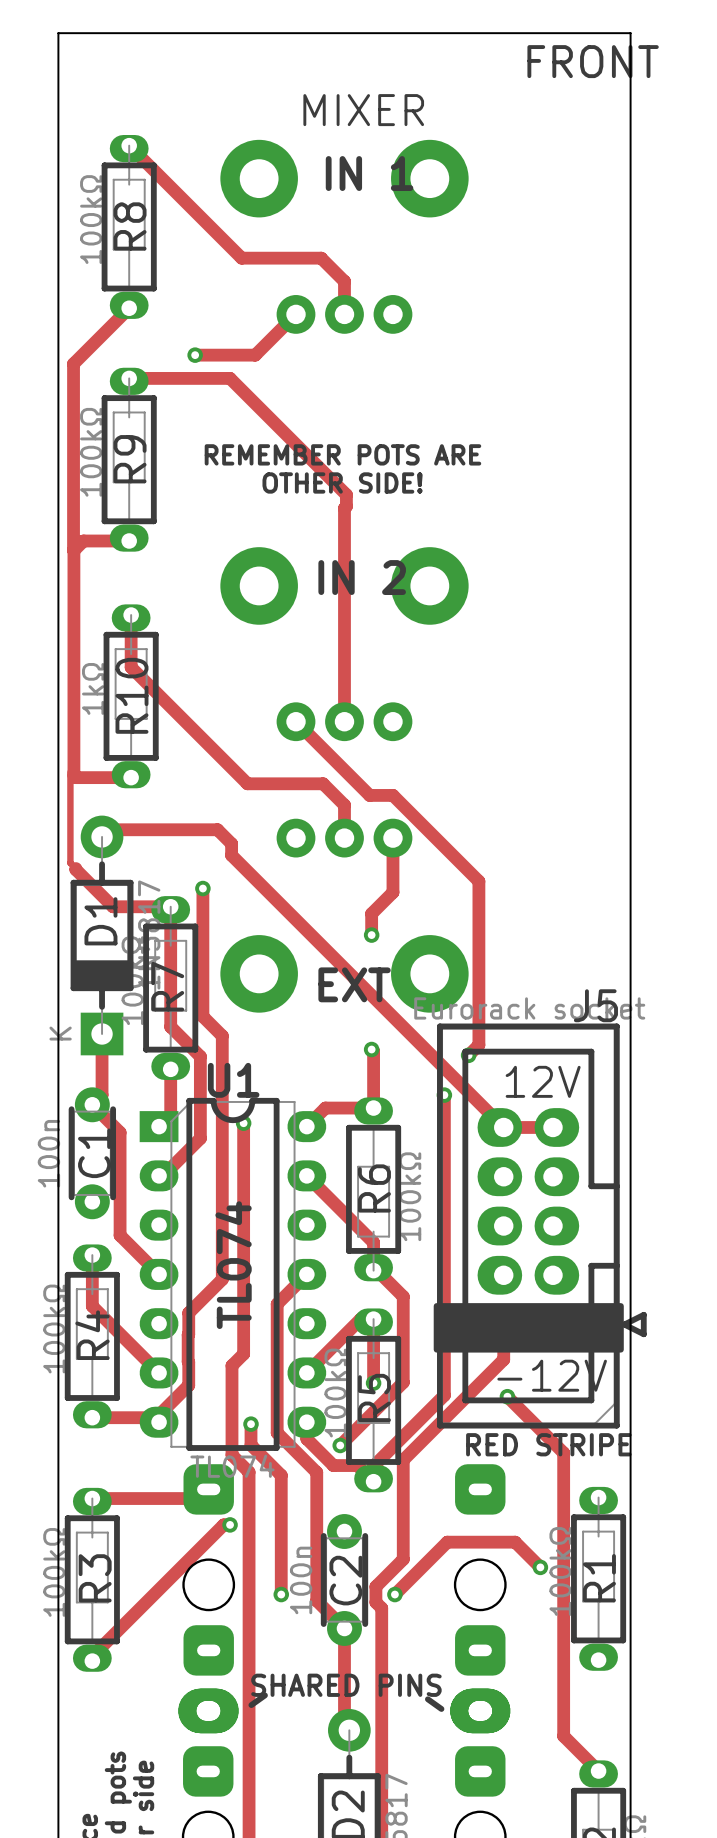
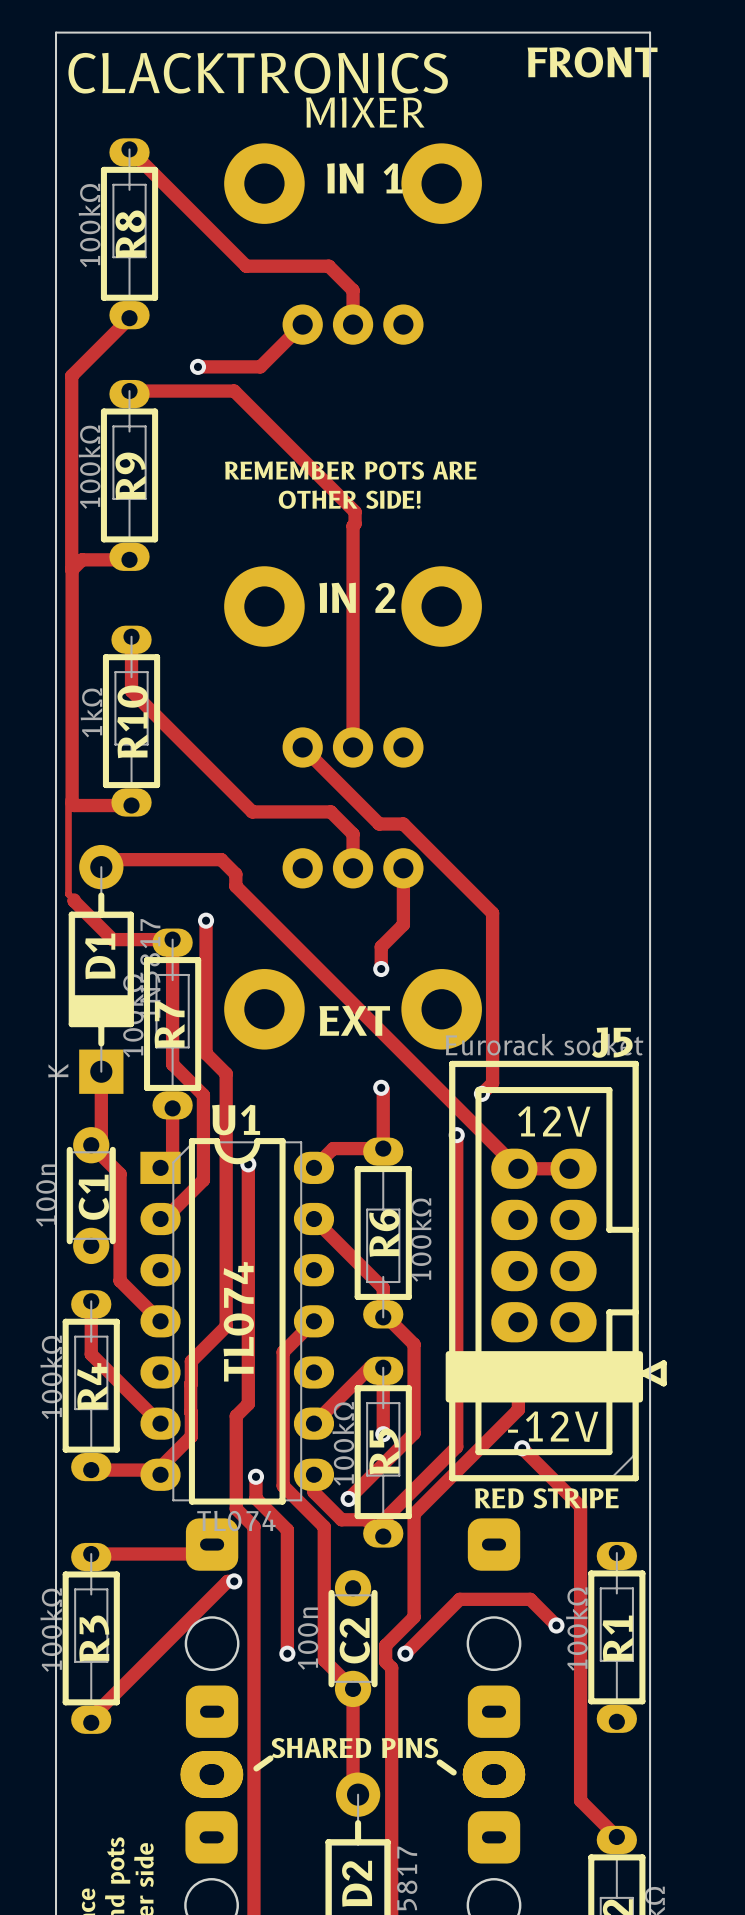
text: none -> CLACKTRONICS (258, 73)

